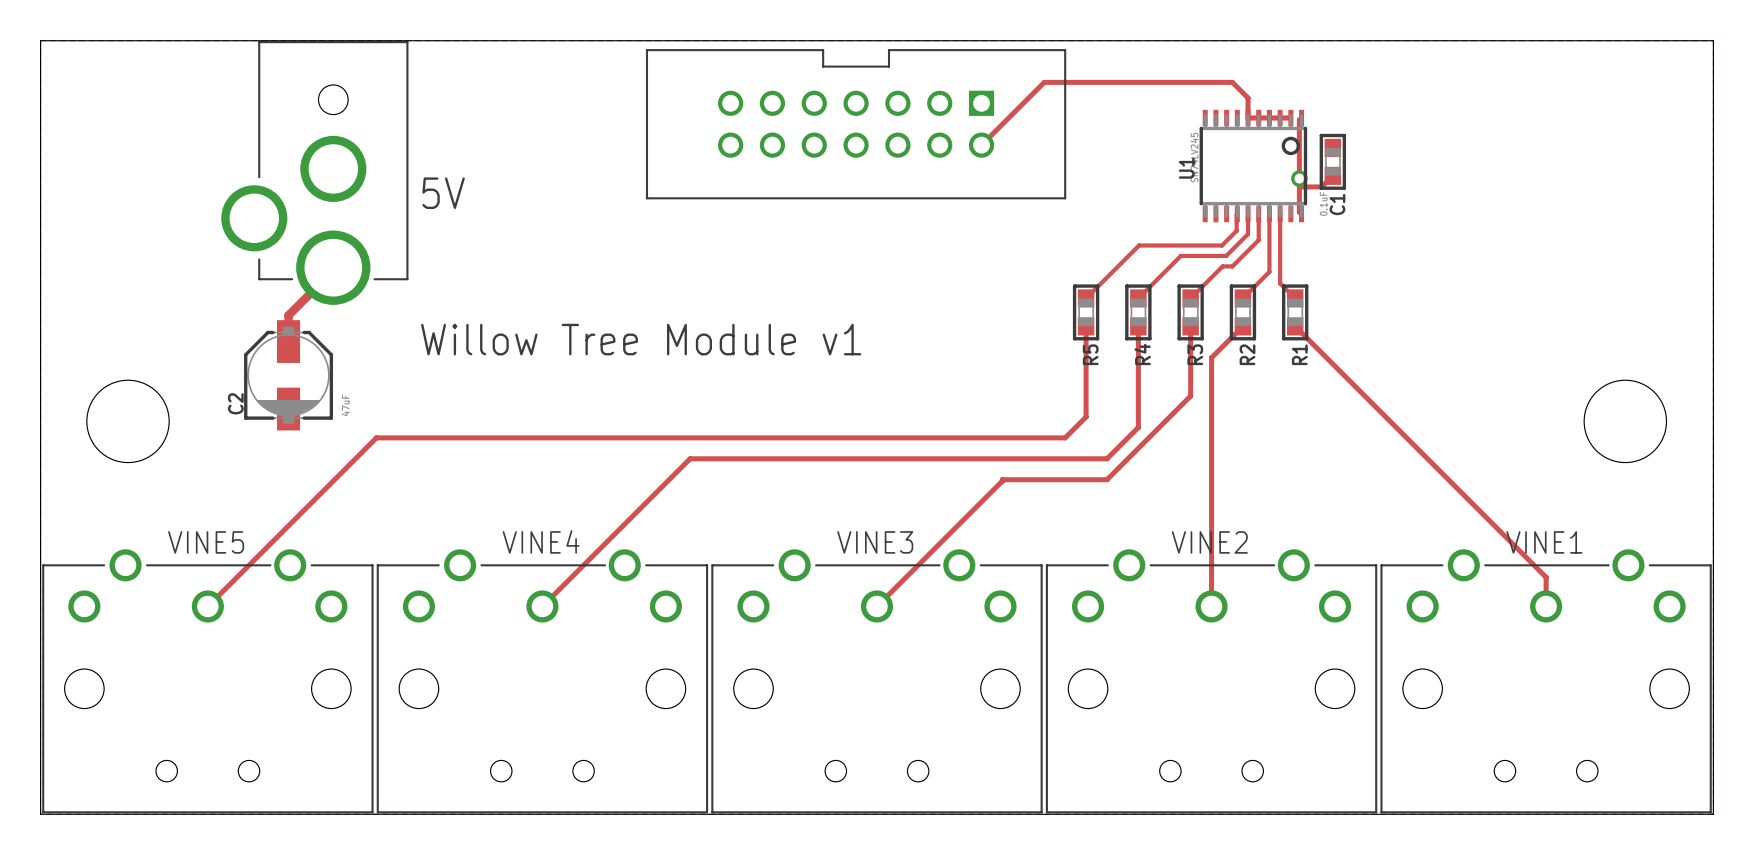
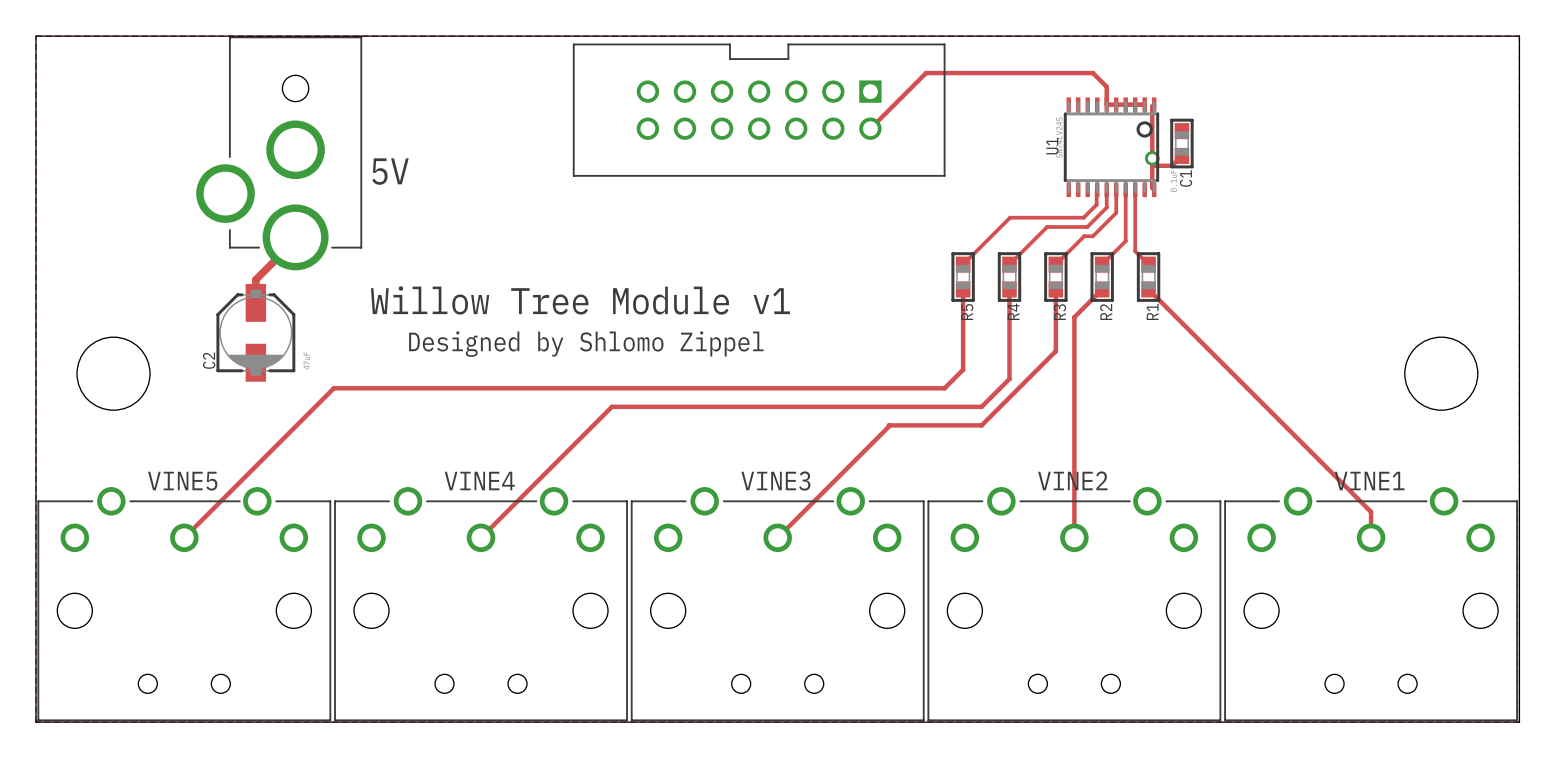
text: none -> Designed by Shlomo Zippel (586, 344)

